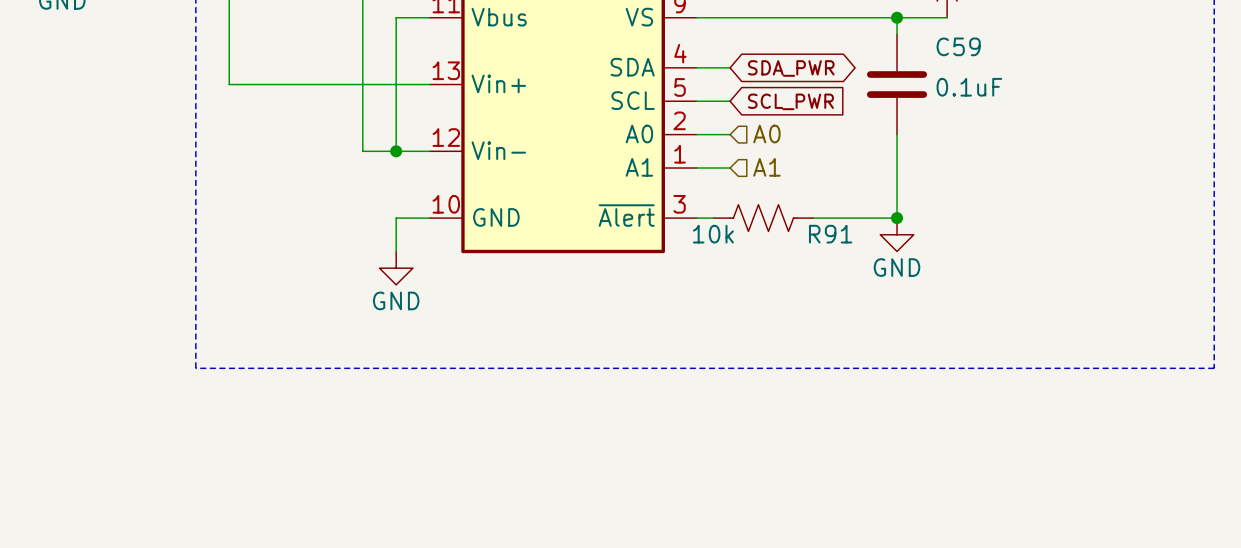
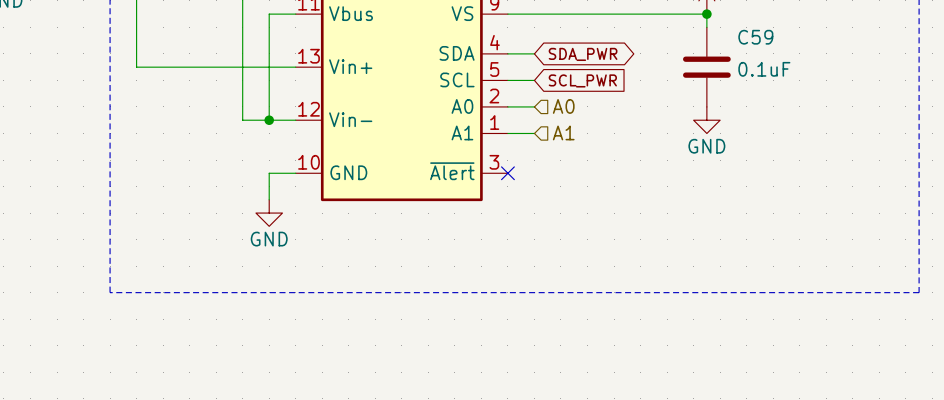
wire: (897, 17) (897, 34) -> (706, 14) (706, 27)
junction position: (897, 17) -> (706, 14)
C59 position: (897, 84) -> (706, 67)
wire: (897, 134) (897, 218) (813, 218) -> none
wire: (696, 218) (713, 218) -> none
no-connect mark: none -> (507, 173)
R91: 10k (763, 218) -> none
junction: (897, 218) -> none
power symbol position: GND (897, 234) -> GND (706, 120)

